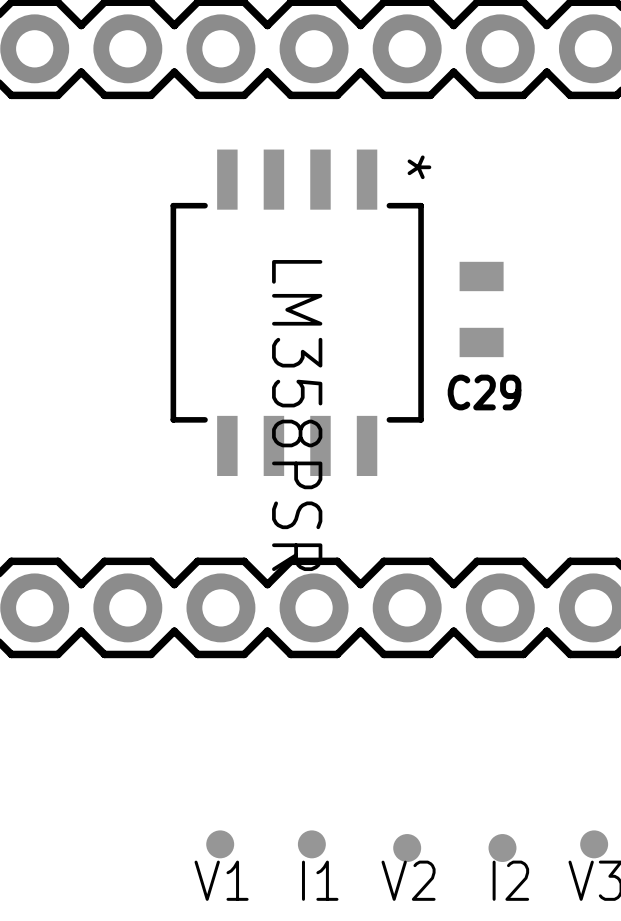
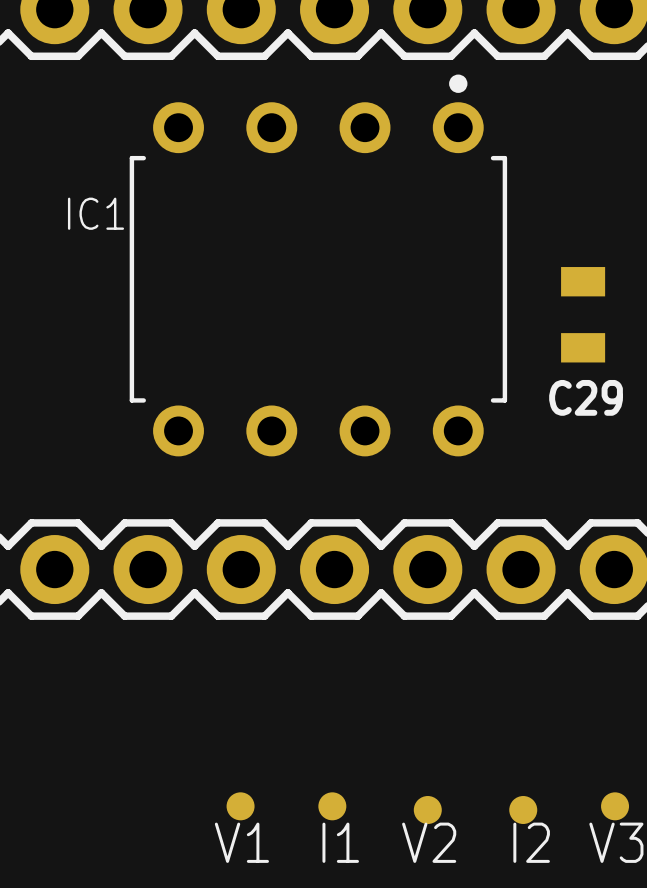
IC1: none -> (318, 265)
C29 position: (481, 309) -> (583, 314)
part: LM358PSR (297, 312) -> none

